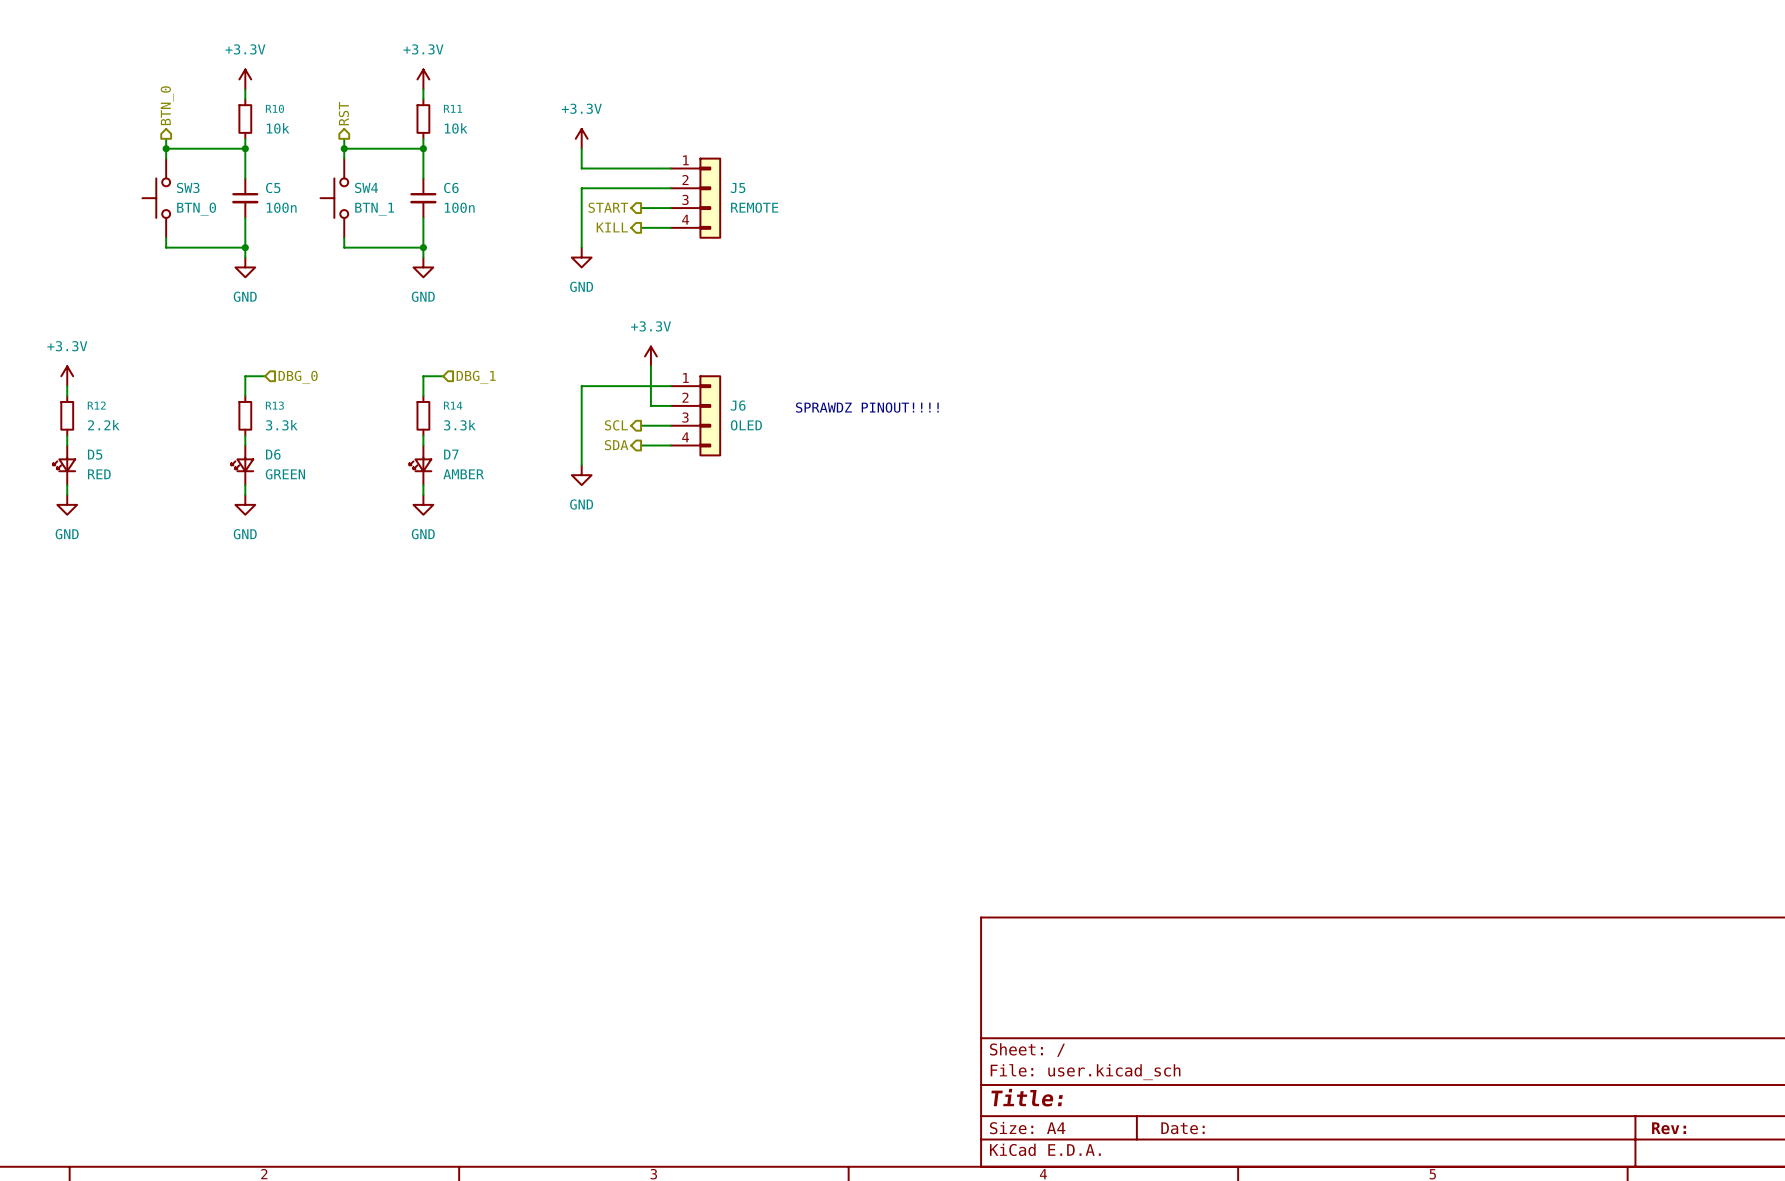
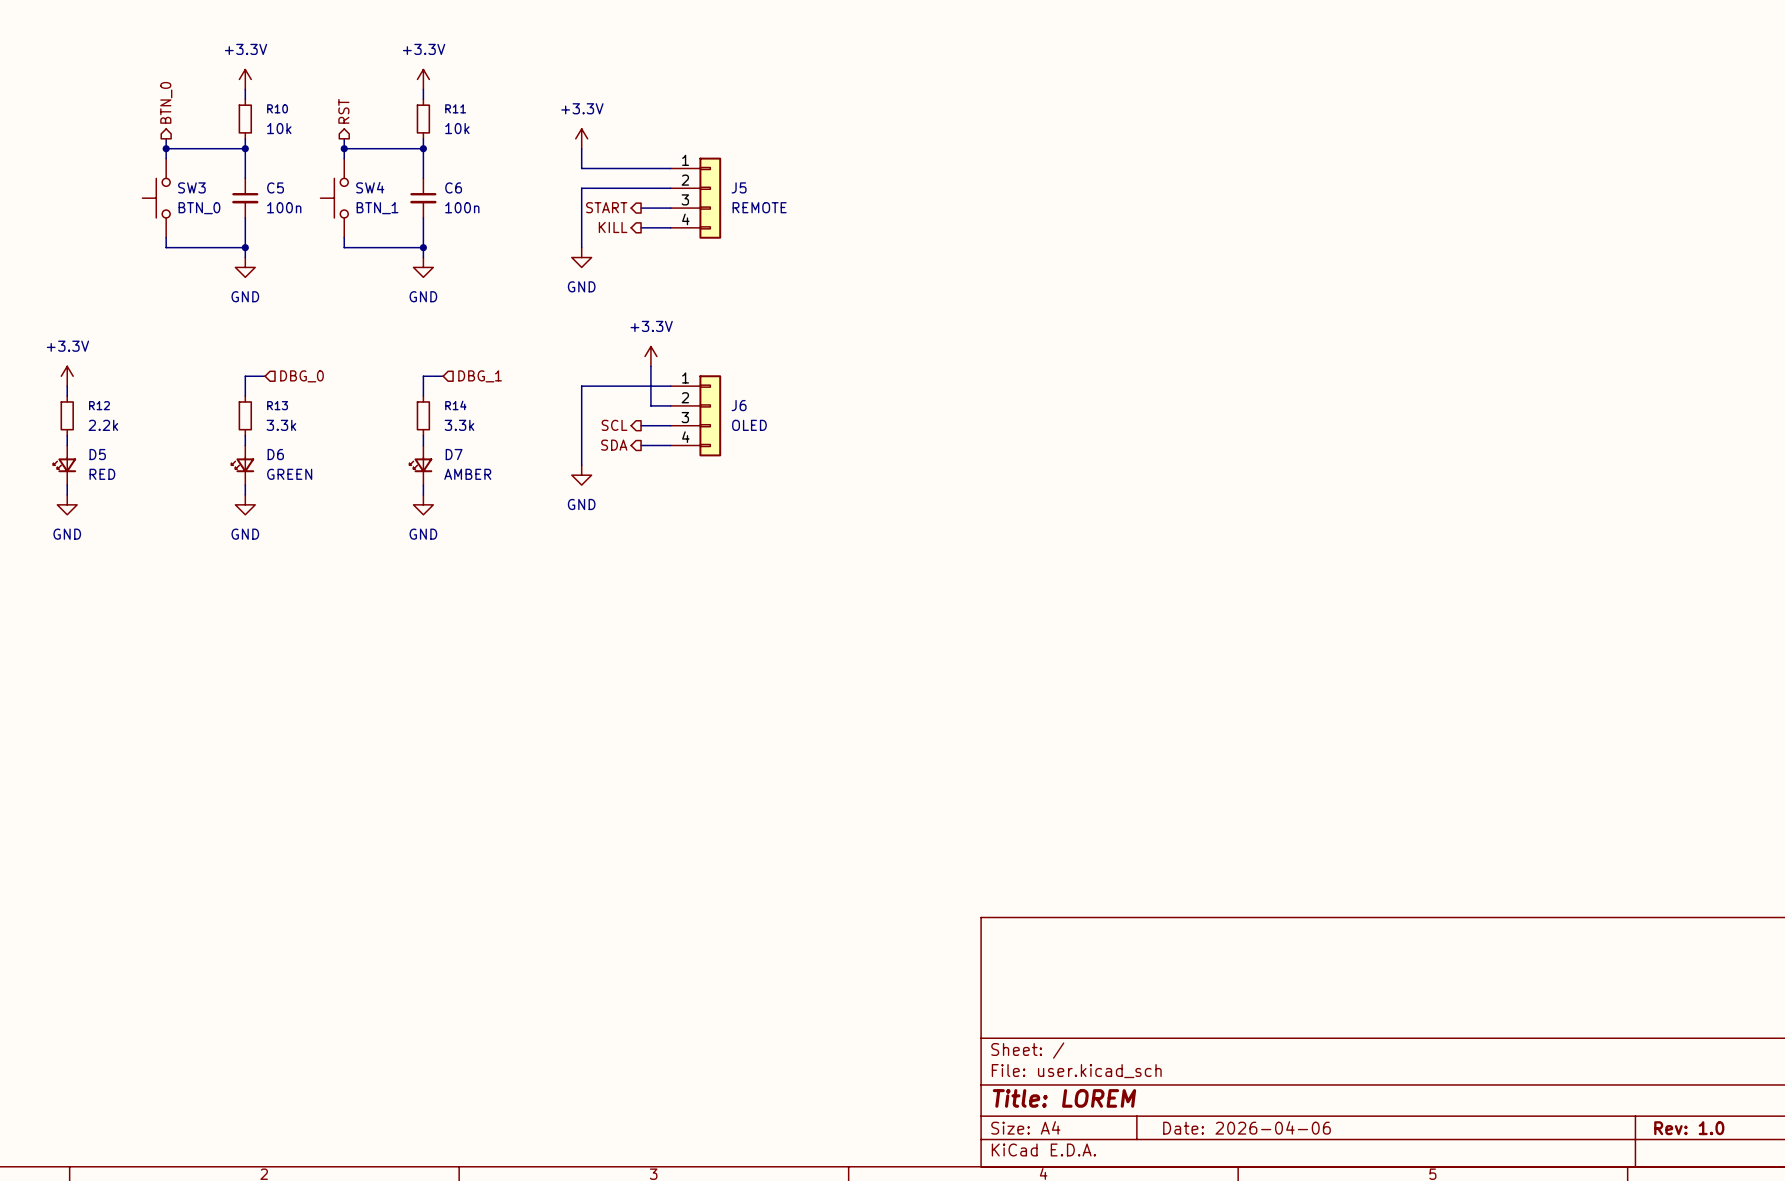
text: SPRAWDZ PINOUT!!!! (867, 407) -> none
title block: Title: (1027, 1097) -> Title: LOREM (1064, 1098)
title block: Date: (1182, 1128) -> Date: 2026-04-06 (1247, 1127)
title block: Rev: (1669, 1128) -> Rev: 1.0 (1689, 1128)

